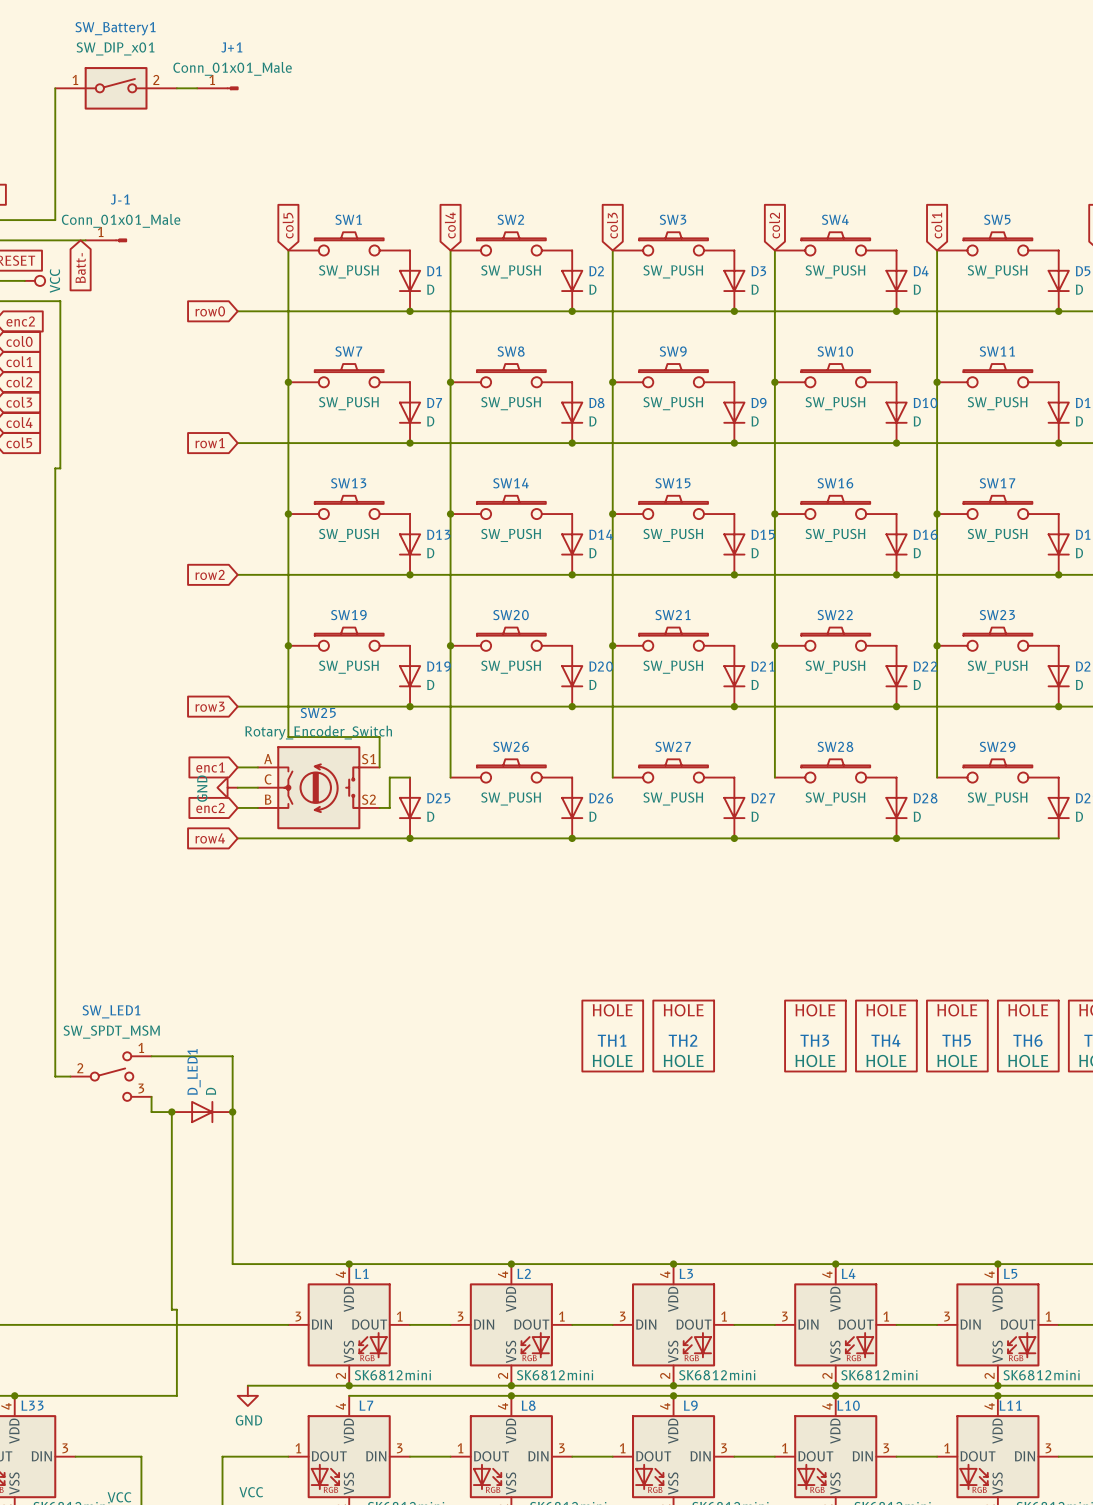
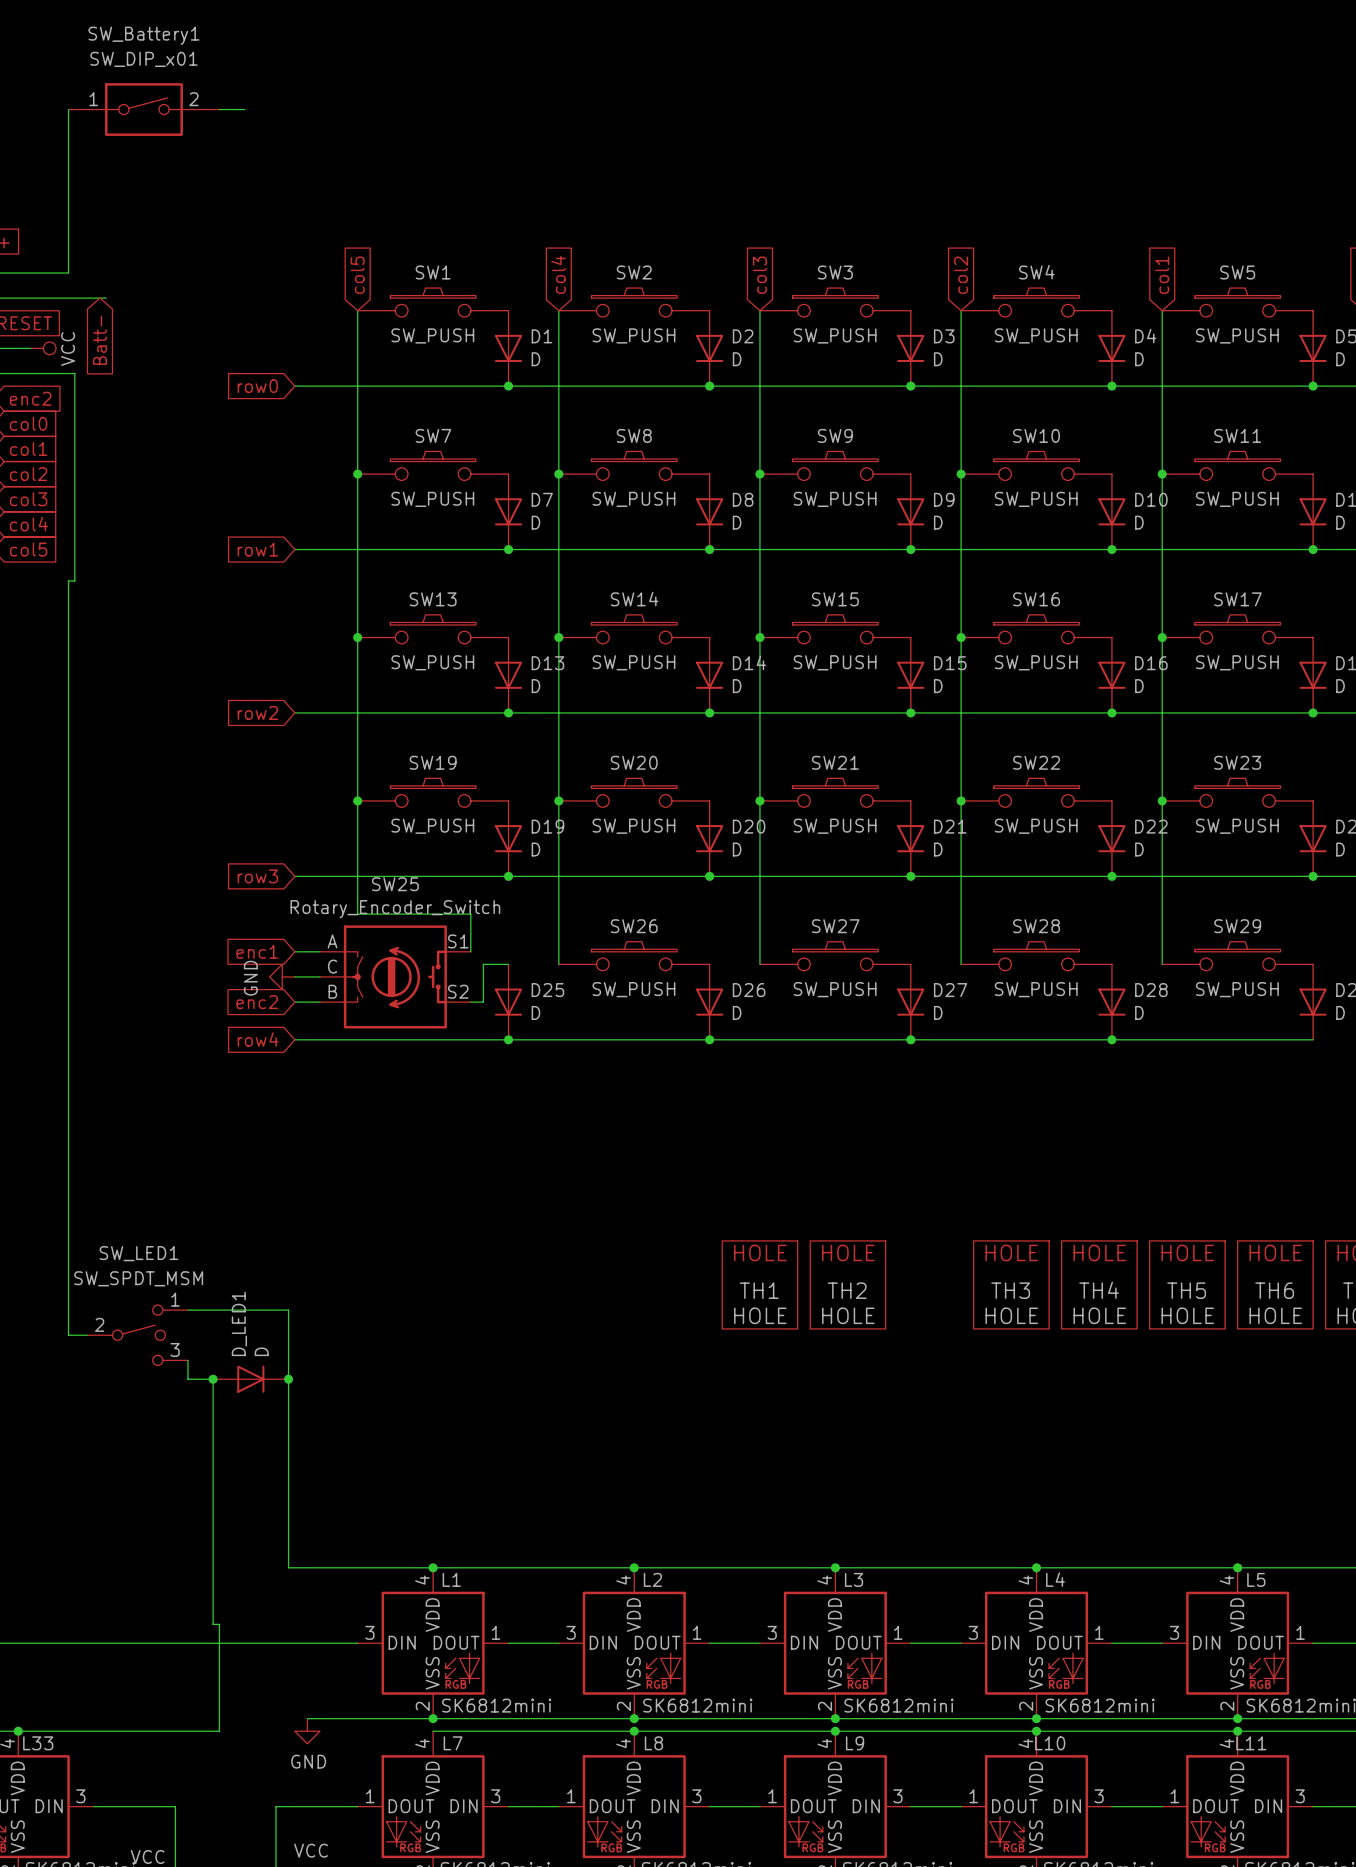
J+1: Conn_01x01_Male (217, 88) -> none
J-1: Conn_01x01_Male (106, 240) -> none

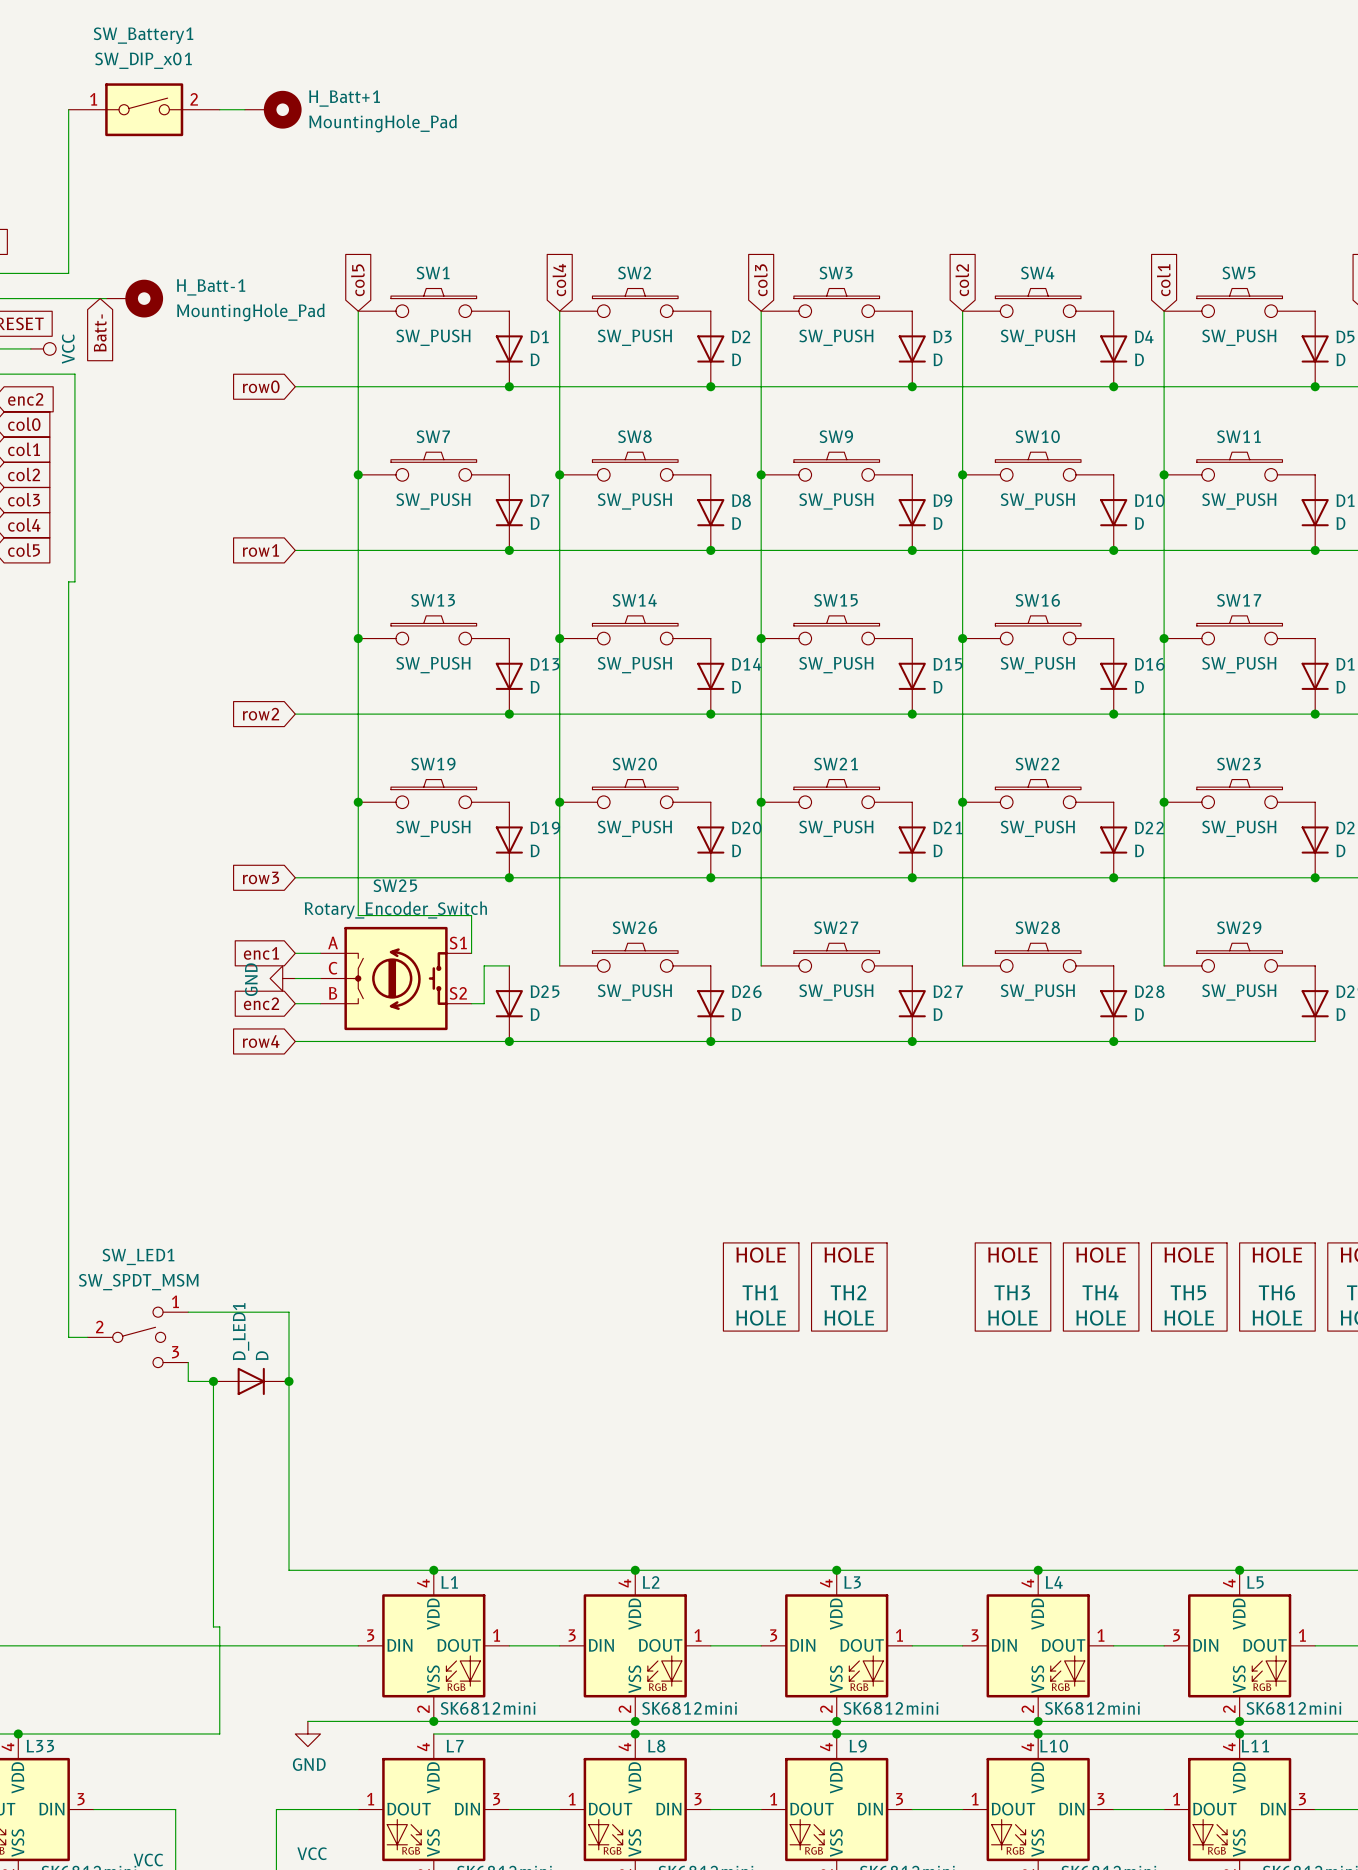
H_Batt+1: none -> MountingHole_Pad (273, 109)
H_Batt-1: none -> MountingHole_Pad (134, 298)

